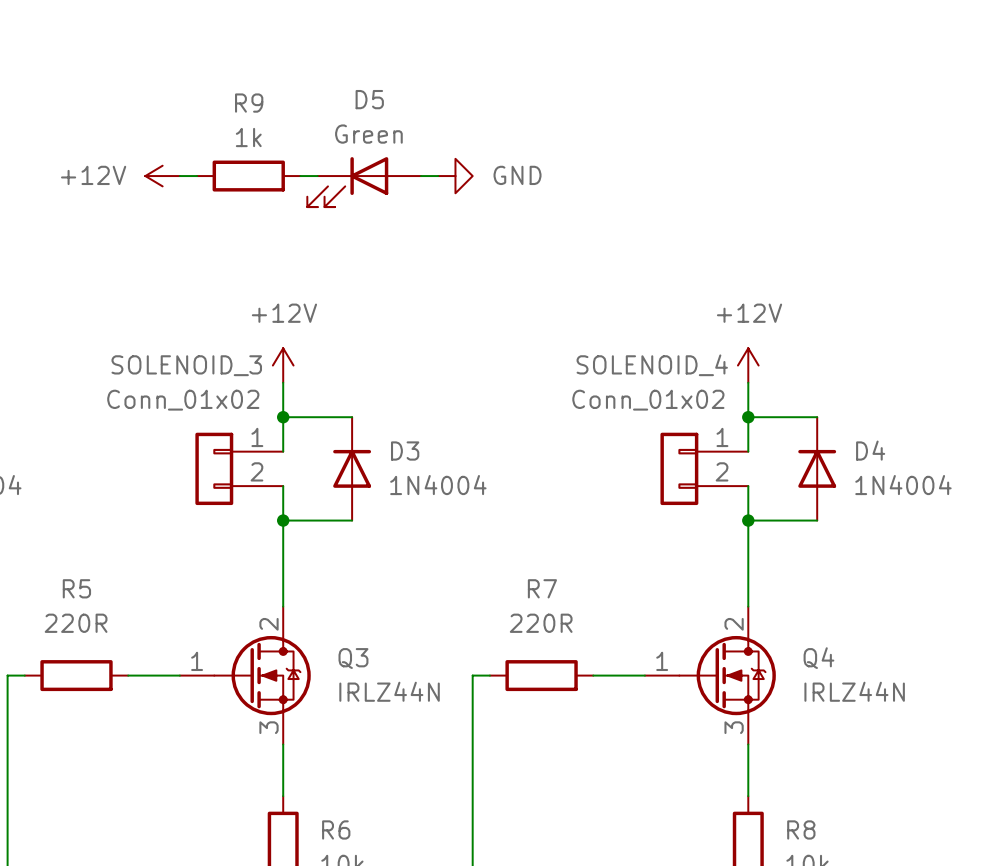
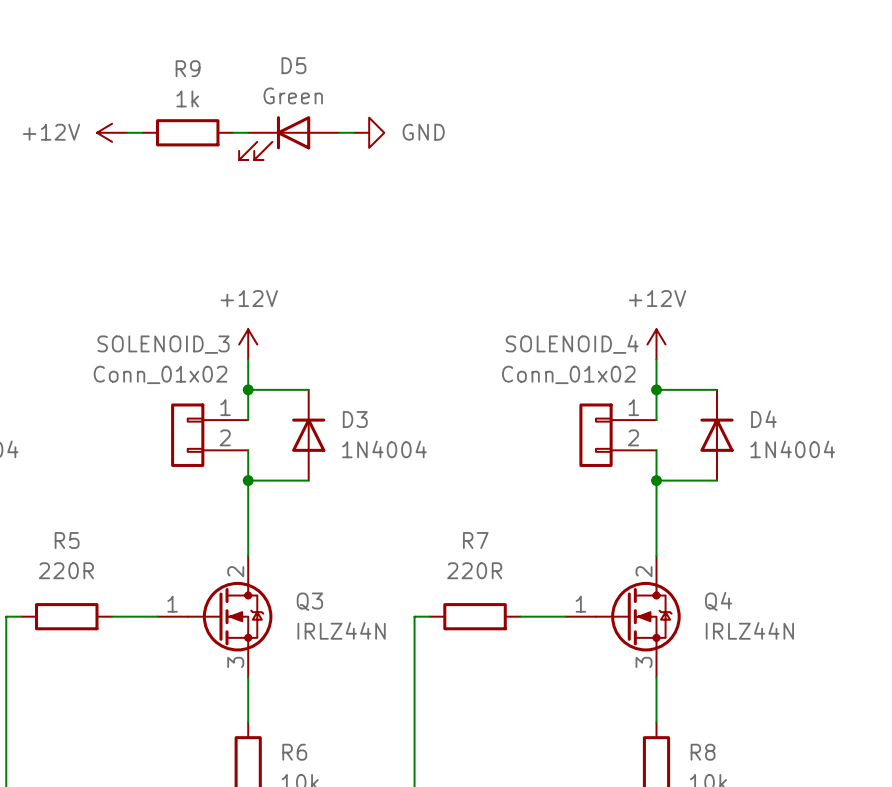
power symbol position: +12V (162, 176) -> +12V (112, 132)
wire: (179, 176) (197, 176) -> (127, 132) (142, 132)
R9 position: (248, 176) -> (187, 132)
wire: (300, 176) (317, 176) -> (233, 132) (248, 132)
wire: (421, 176) (438, 176) -> (338, 132) (354, 132)
power symbol position: GND (455, 176) -> GND (369, 132)
D5 position: (364, 182) -> (289, 138)

